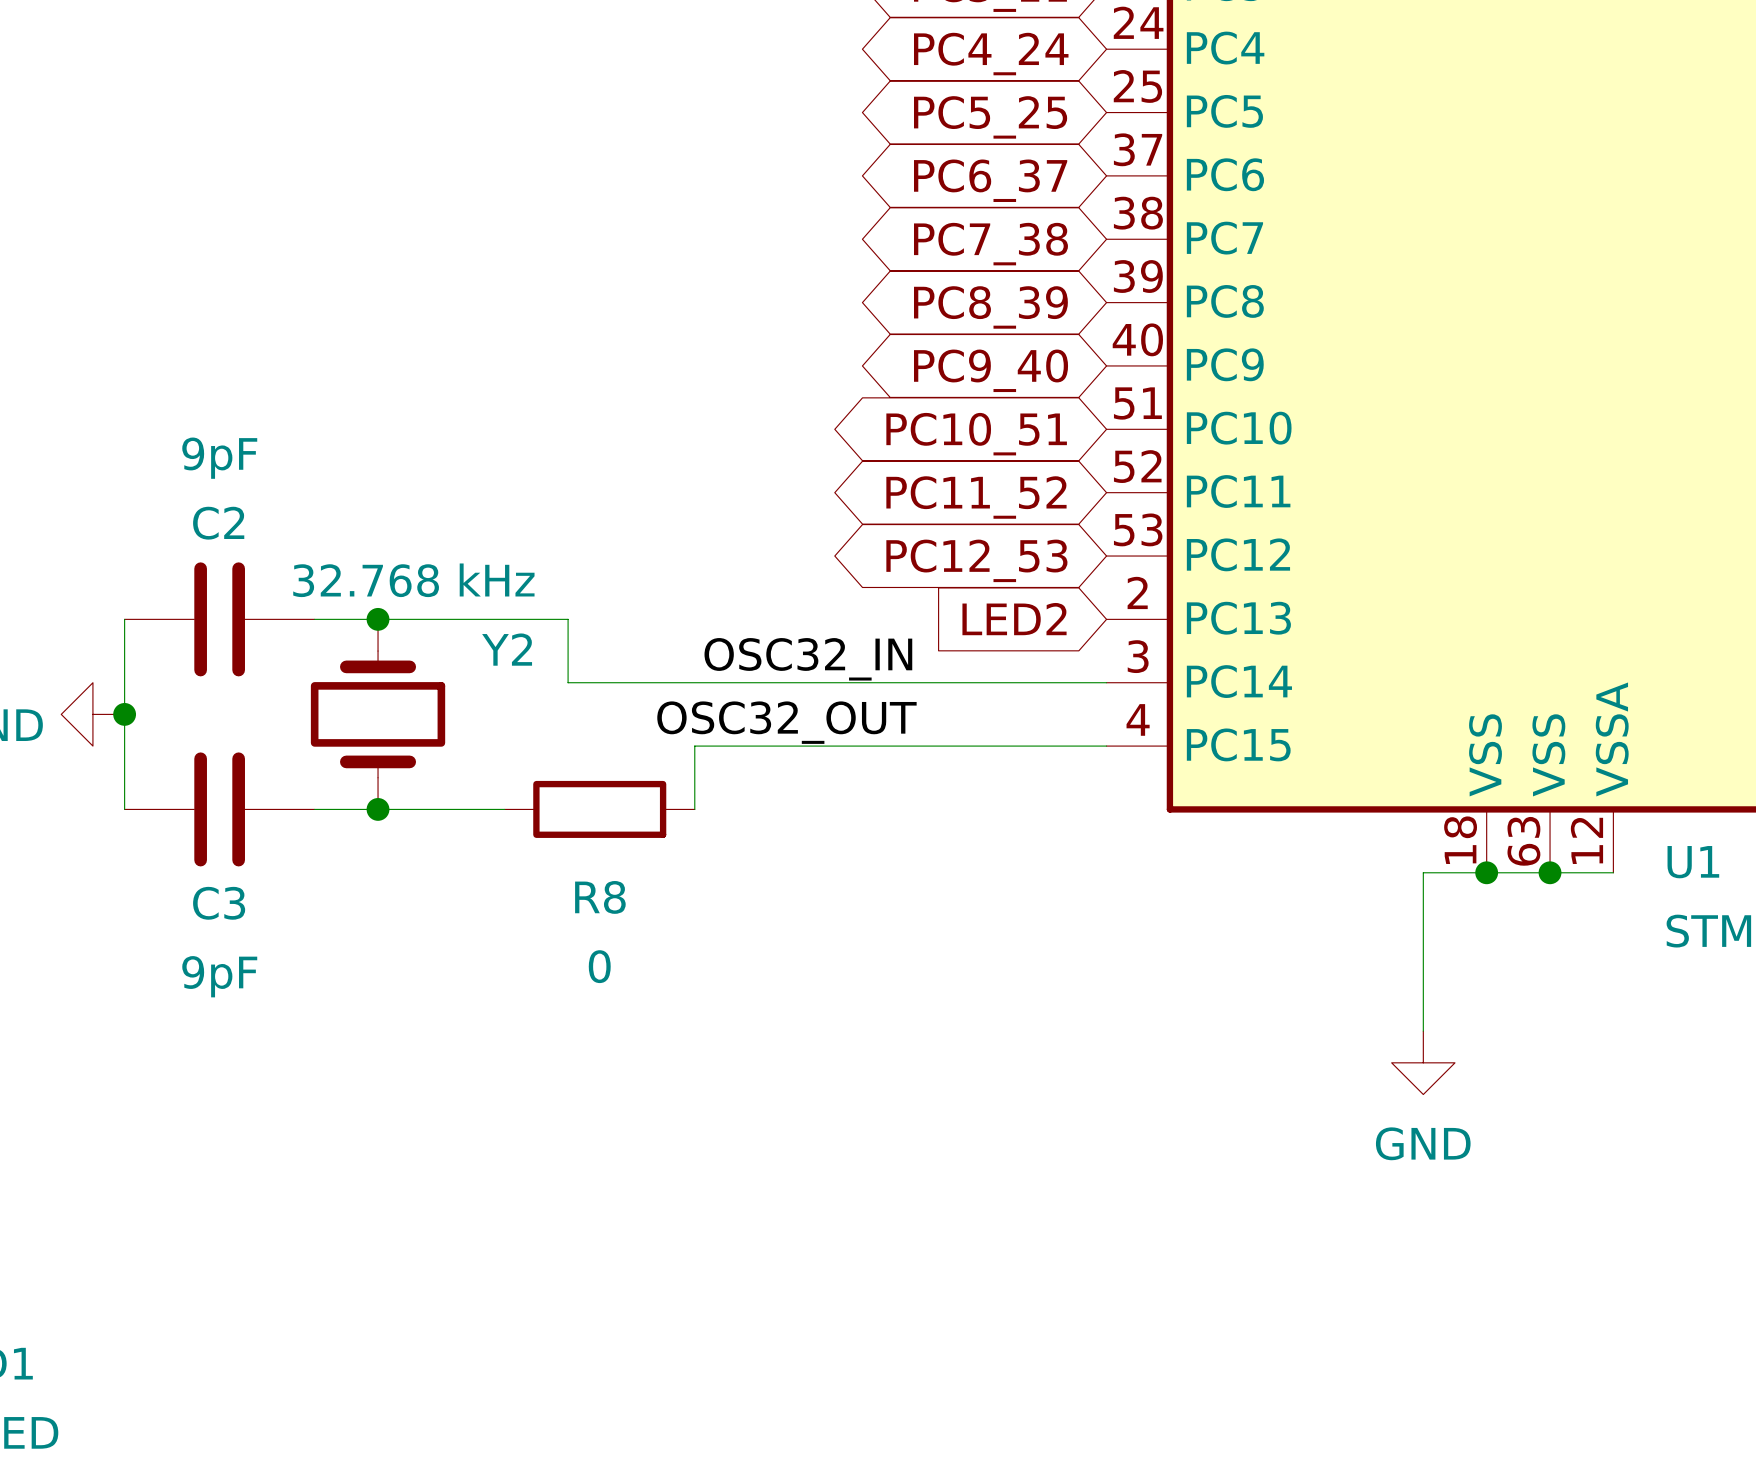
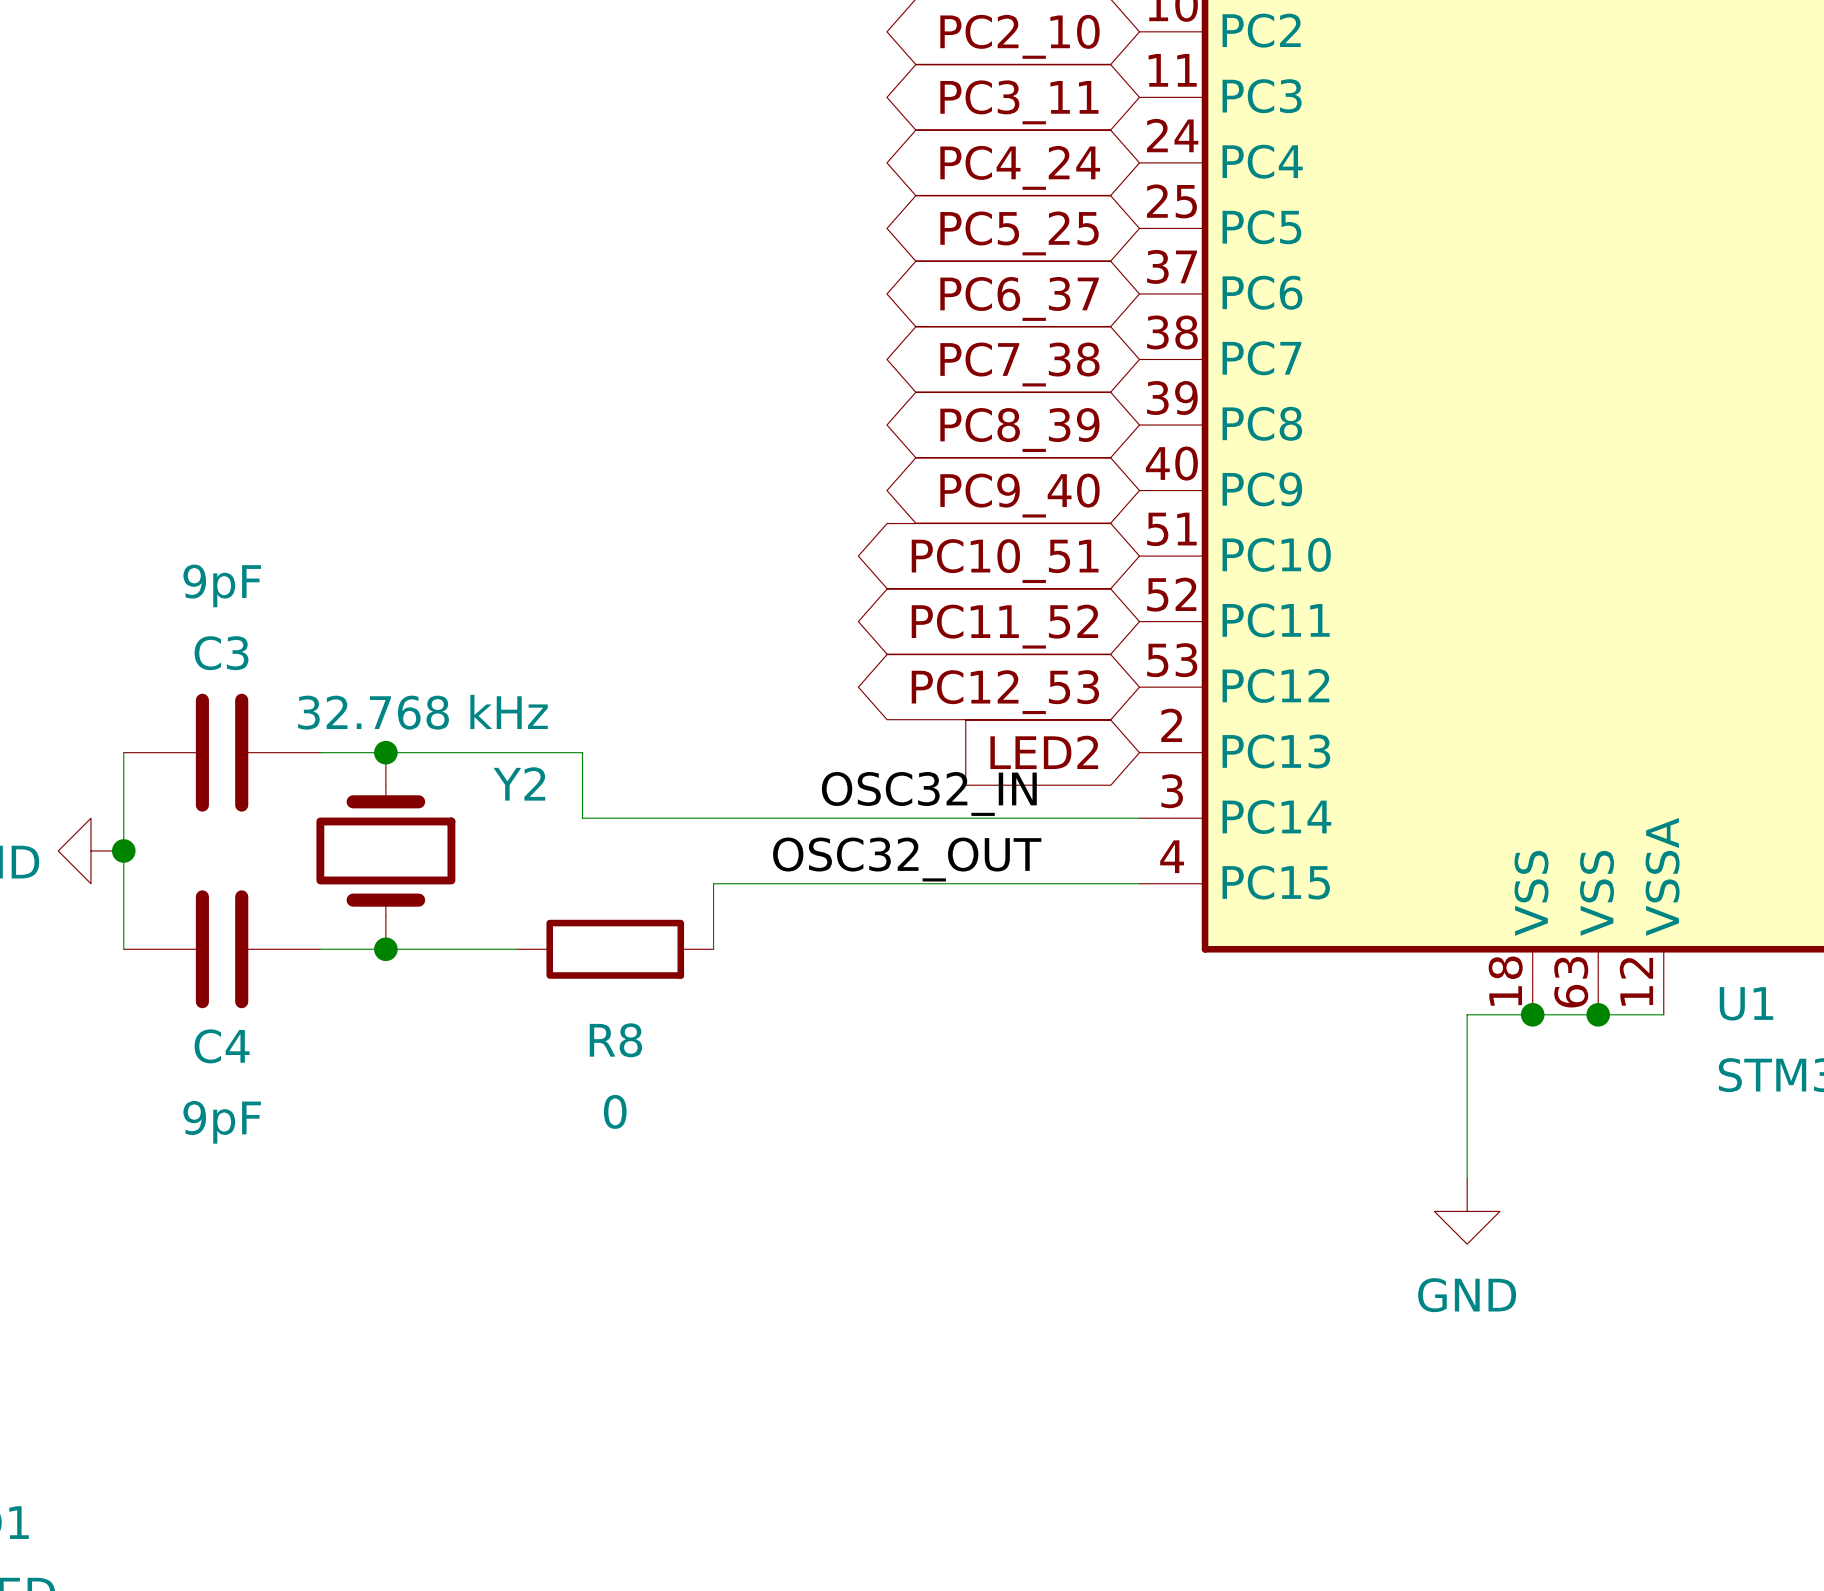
C2 name: C2 (218, 523) -> C3 (221, 653)
label position: OSC32_IN (808, 659) -> OSC32_IN (929, 793)
label position: OSC32_OUT (786, 722) -> OSC32_OUT (907, 859)
C3 name: C3 (219, 903) -> C4 (222, 1046)

